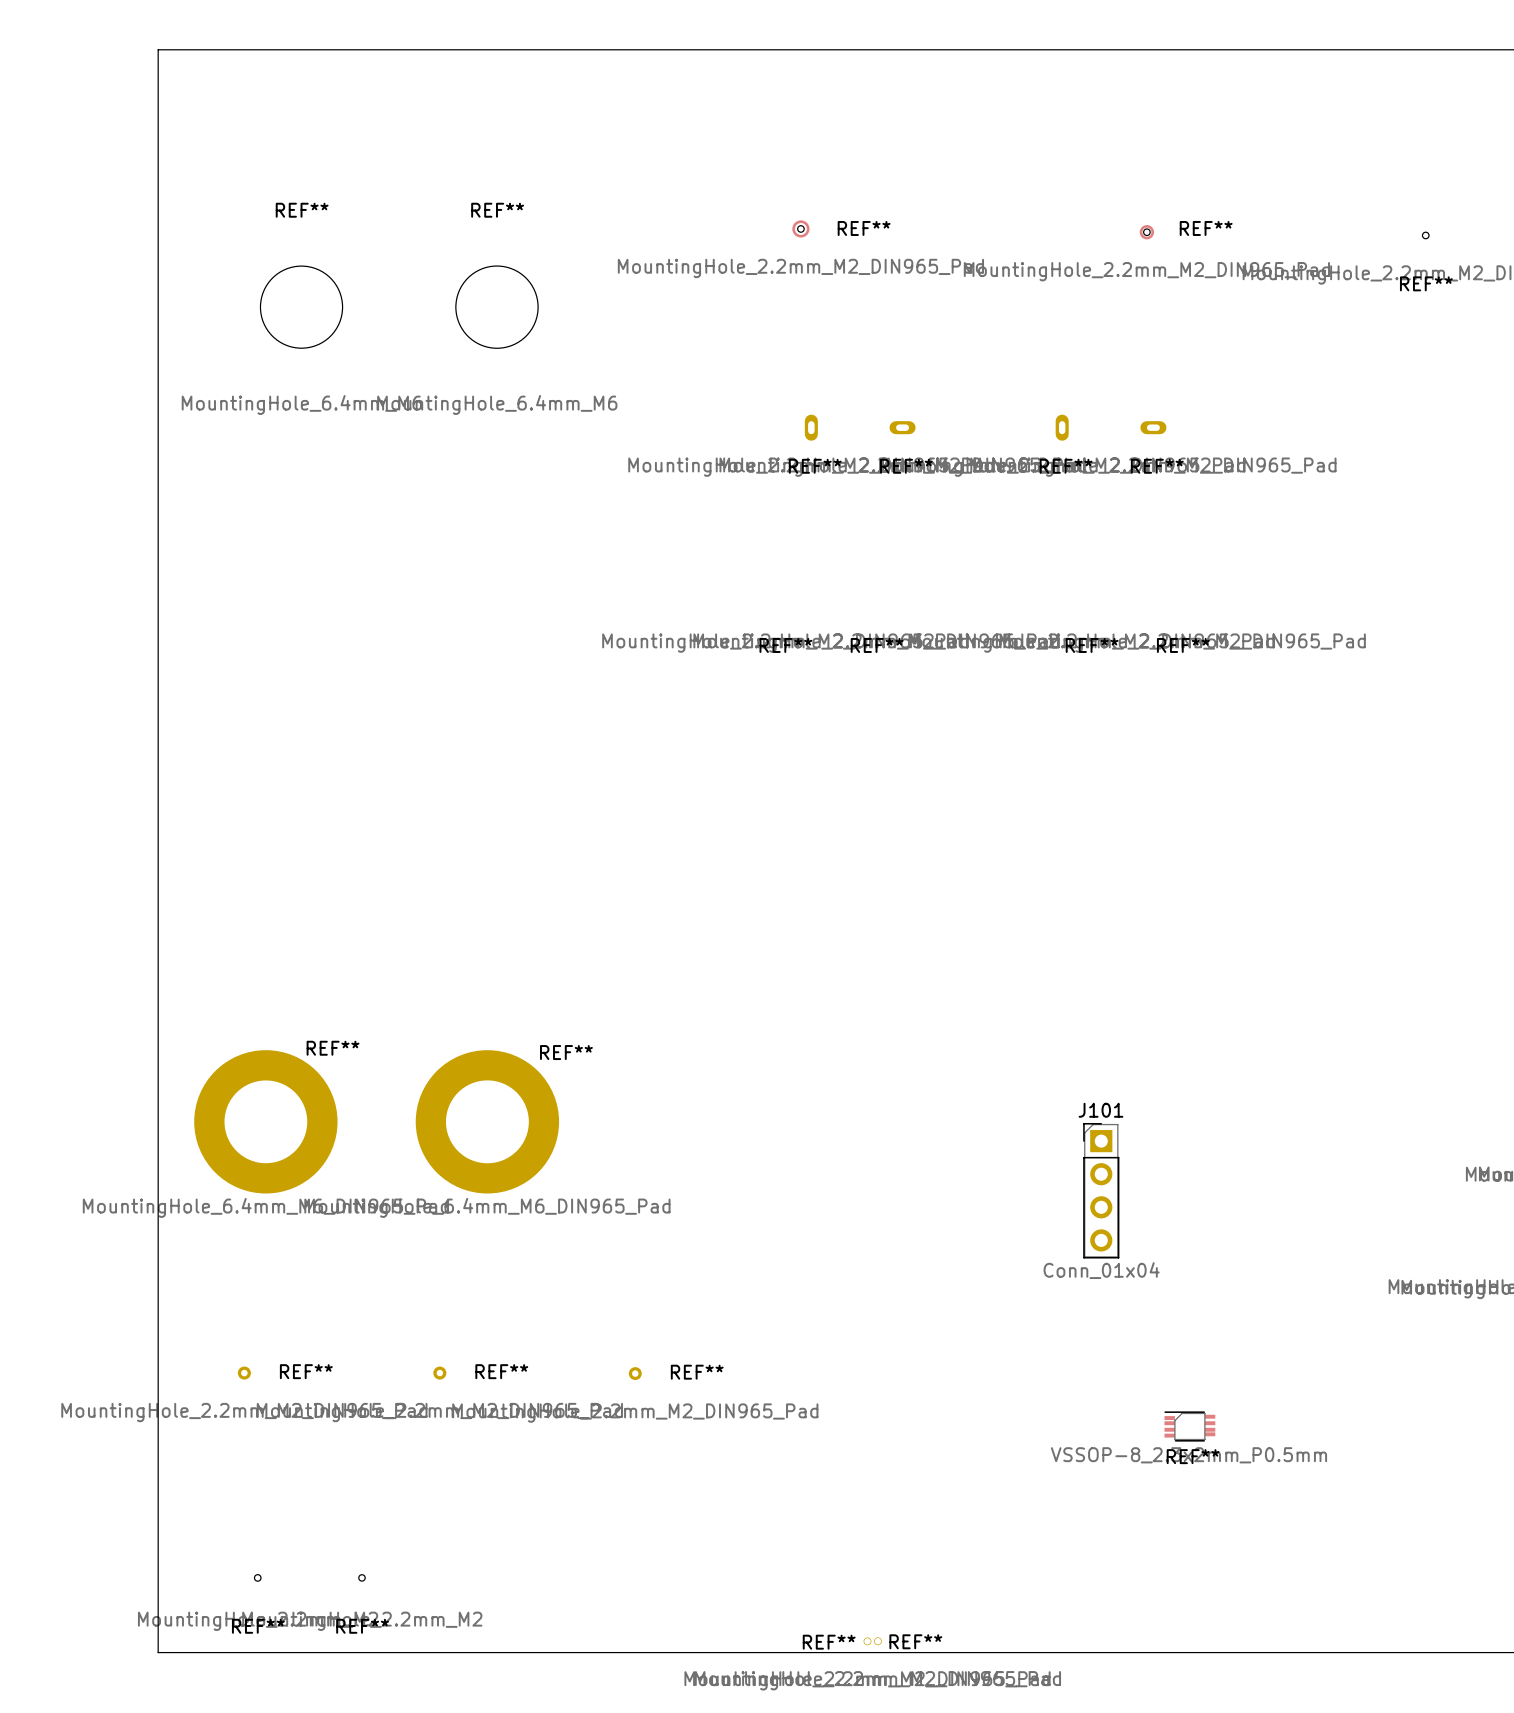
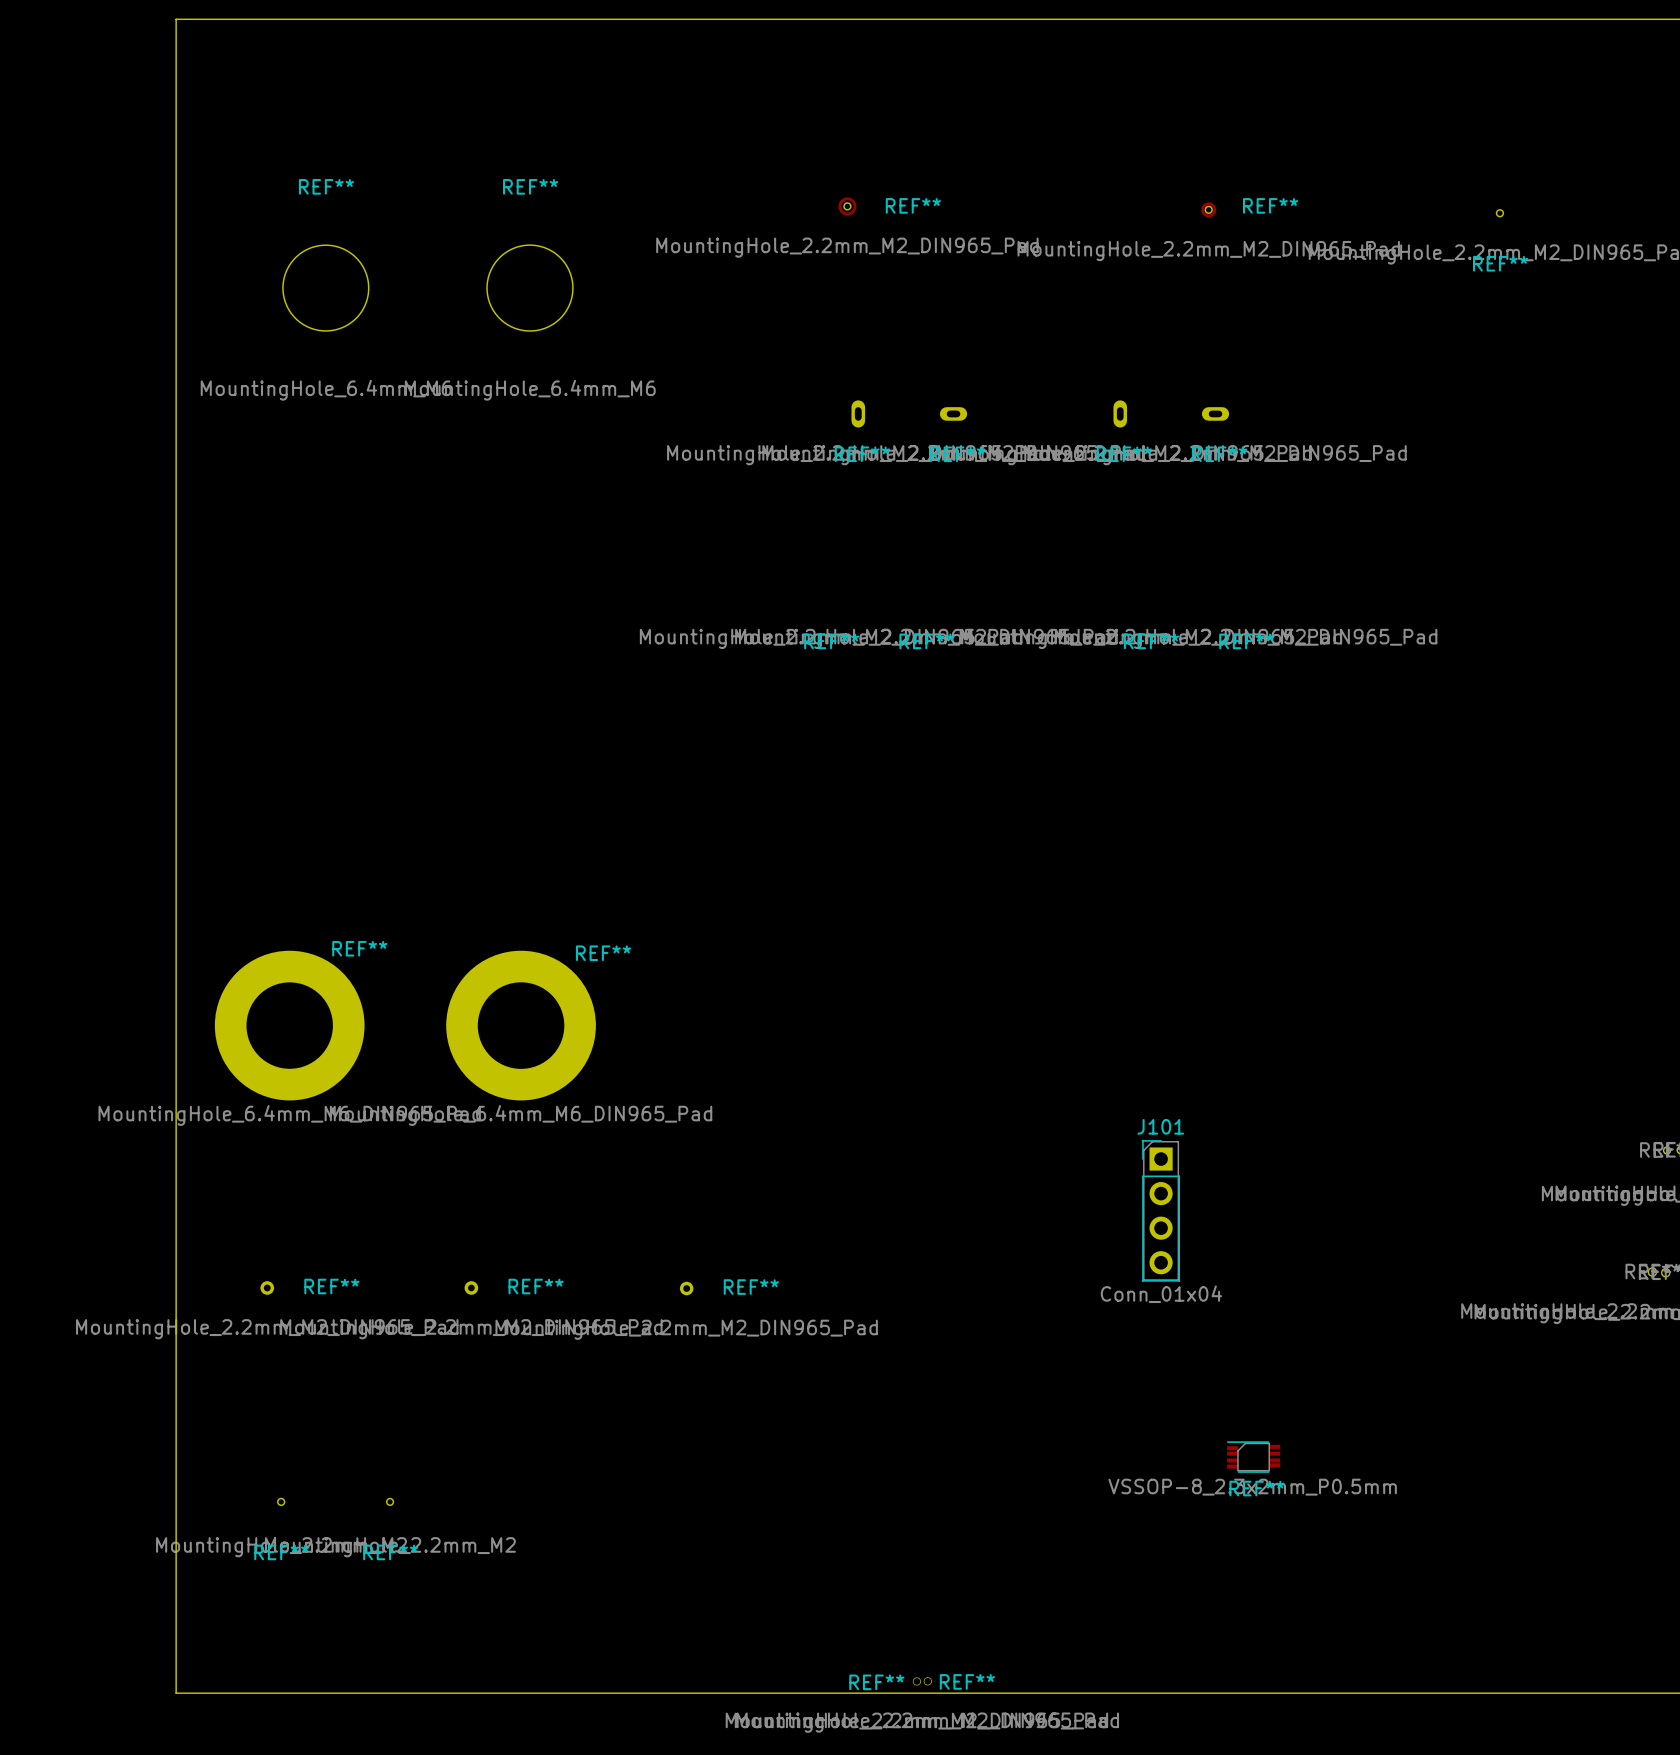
REF** position: (265, 1121) -> (289, 1025)
REF** position: (487, 1121) -> (521, 1025)
REF** position: (244, 1373) -> (267, 1287)
REF** position: (439, 1373) -> (471, 1287)
REF** position: (635, 1373) -> (686, 1288)
REF** position: (257, 1577) -> (281, 1501)
REF** position: (361, 1577) -> (390, 1501)

